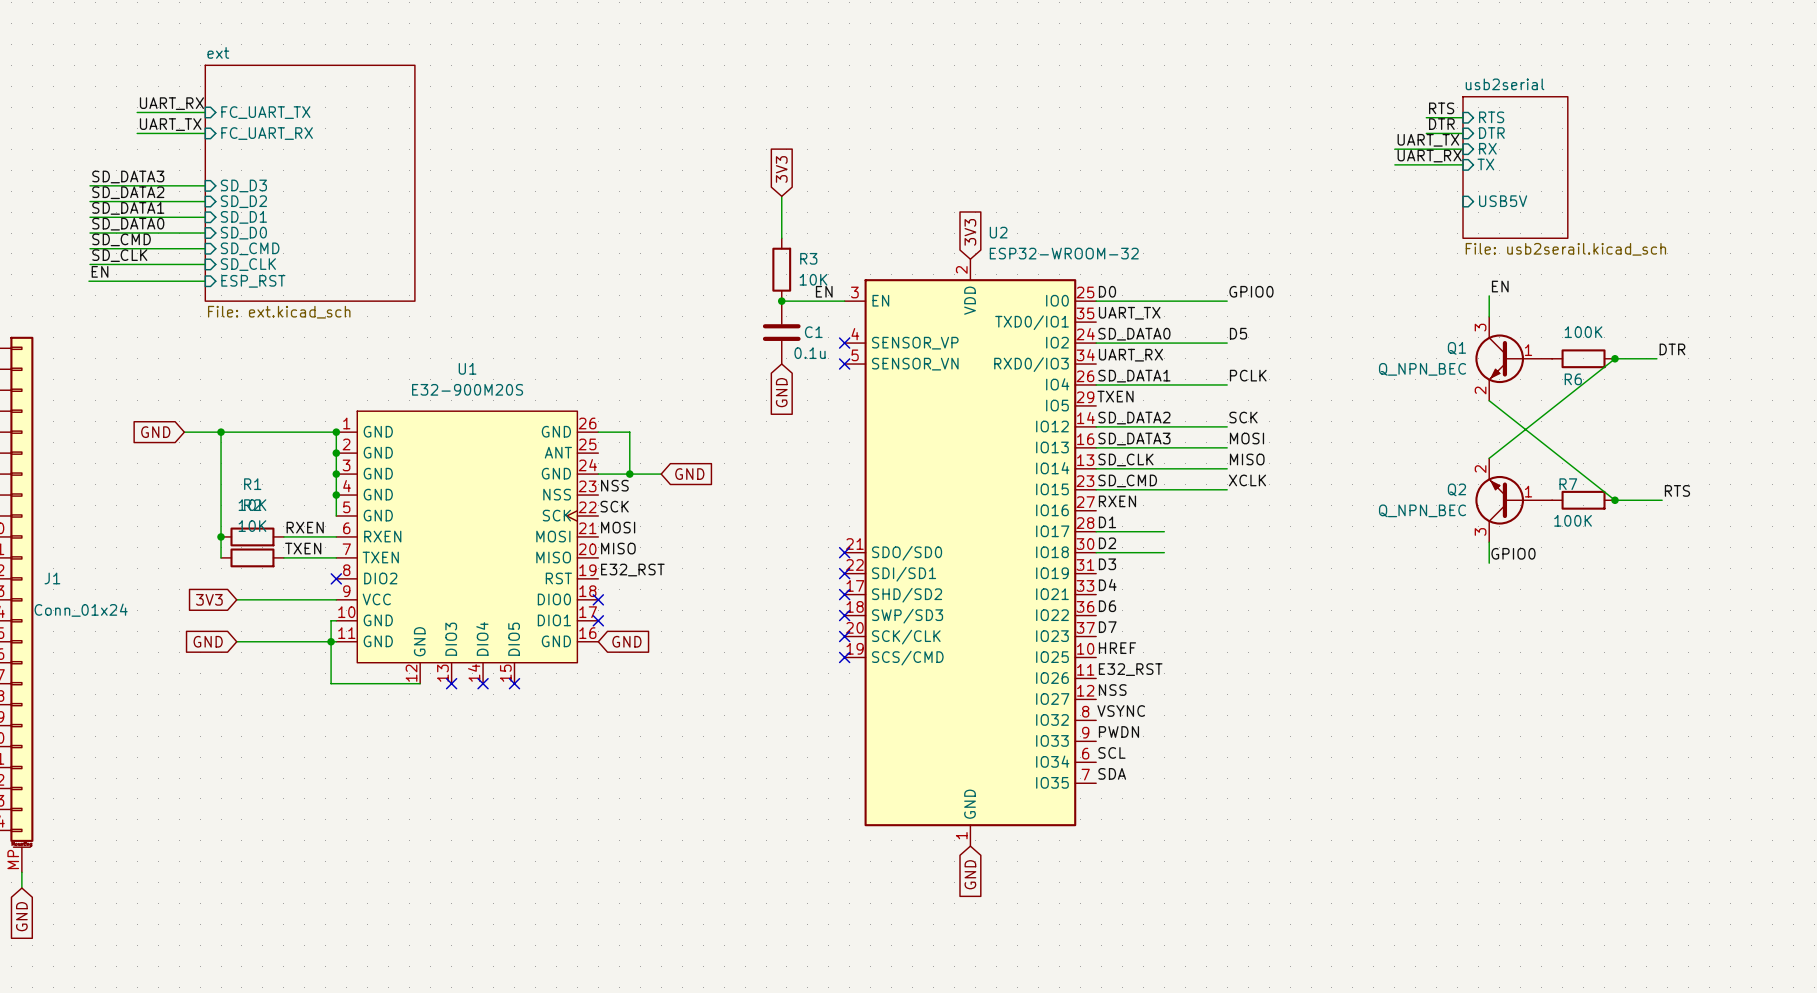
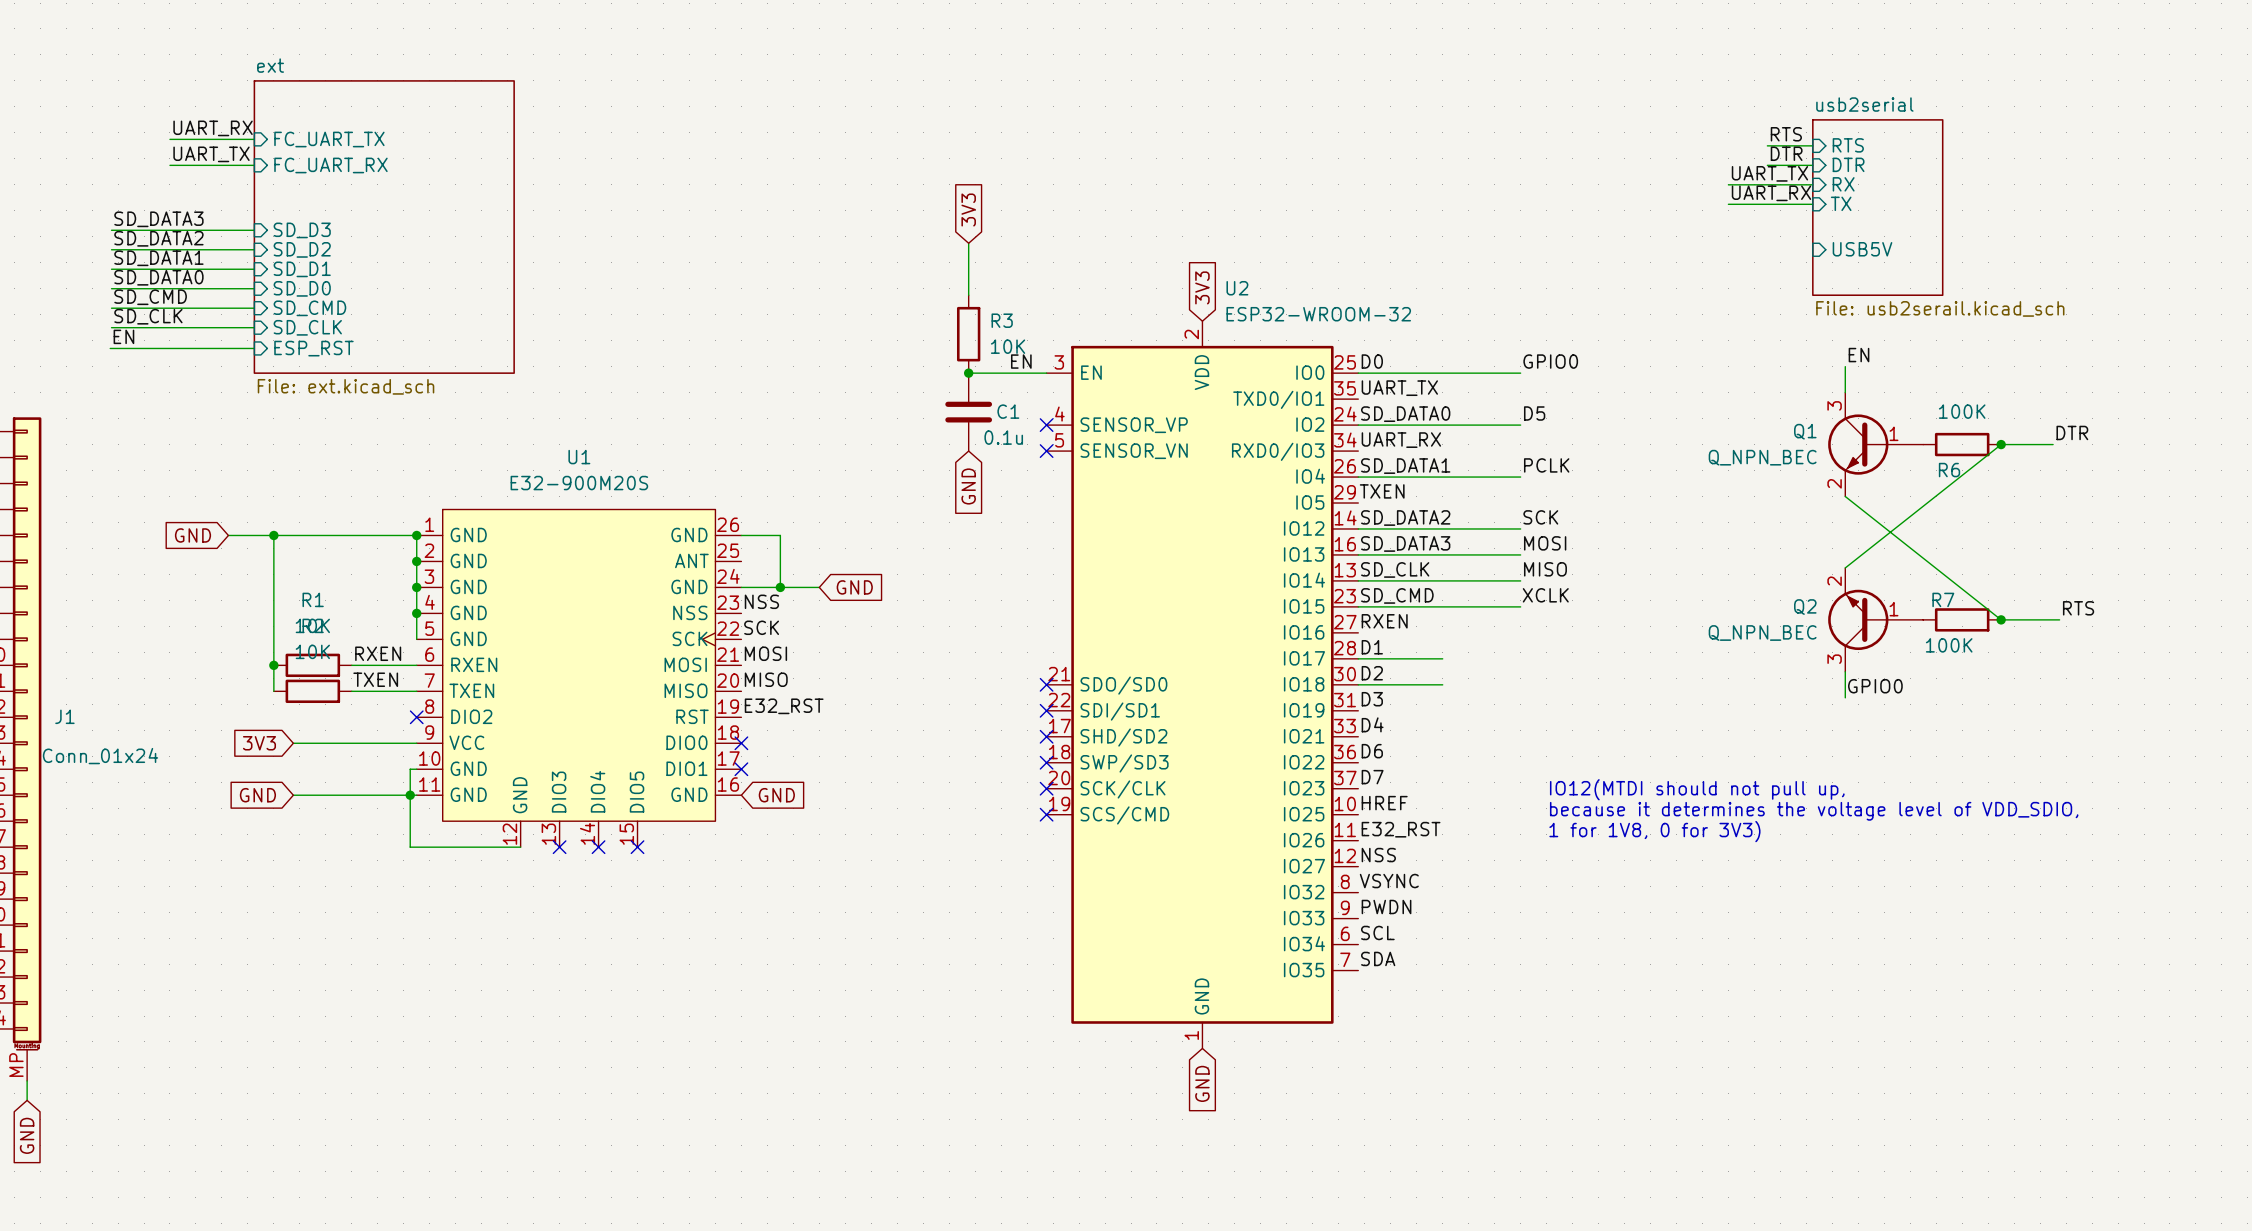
text: none -> IO12(MTDI should not pull up, (1697, 789)
text: none -> because it determines the voltage level of VDD_SDIO, (1814, 811)
text: none -> 1 for 1V8, 0 for 3V3) (1654, 831)

